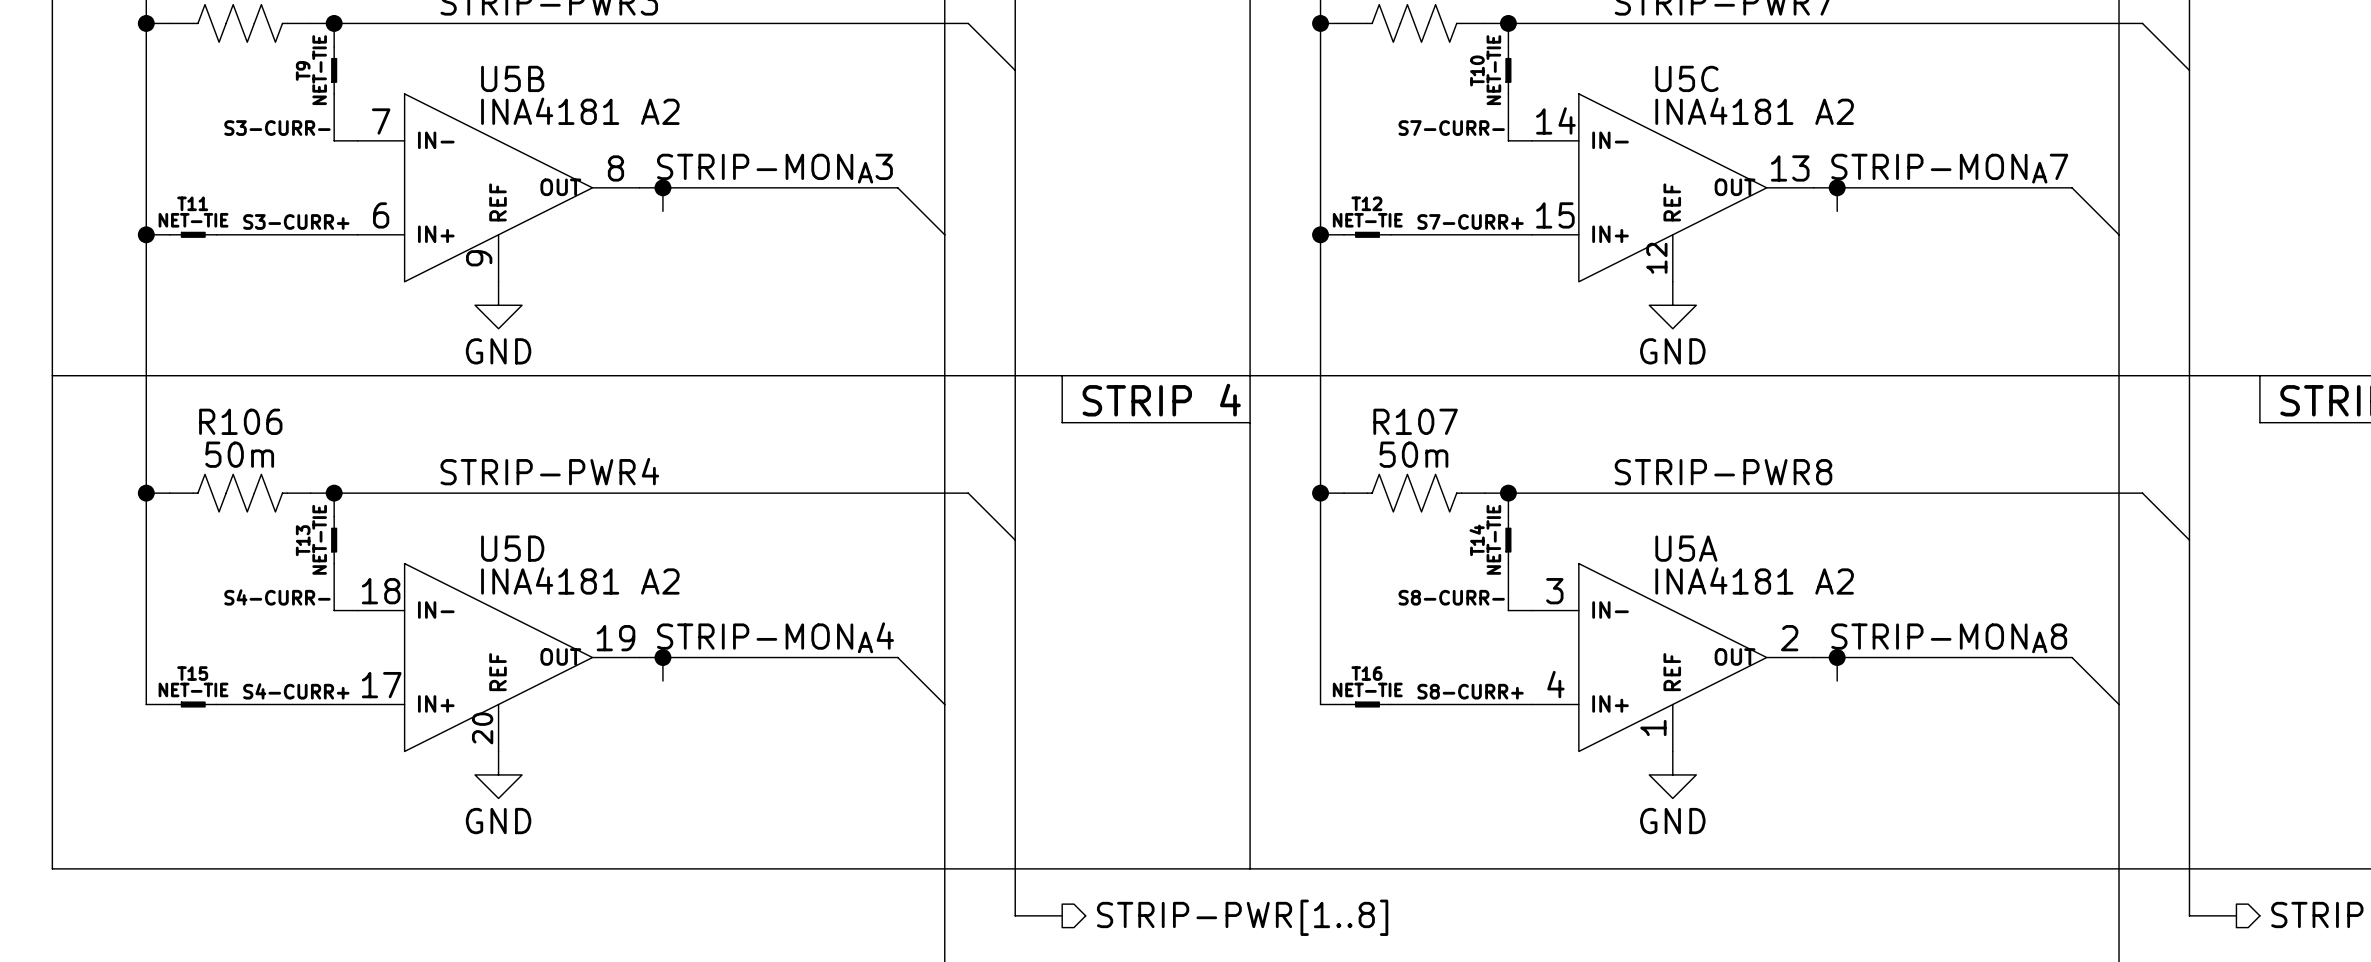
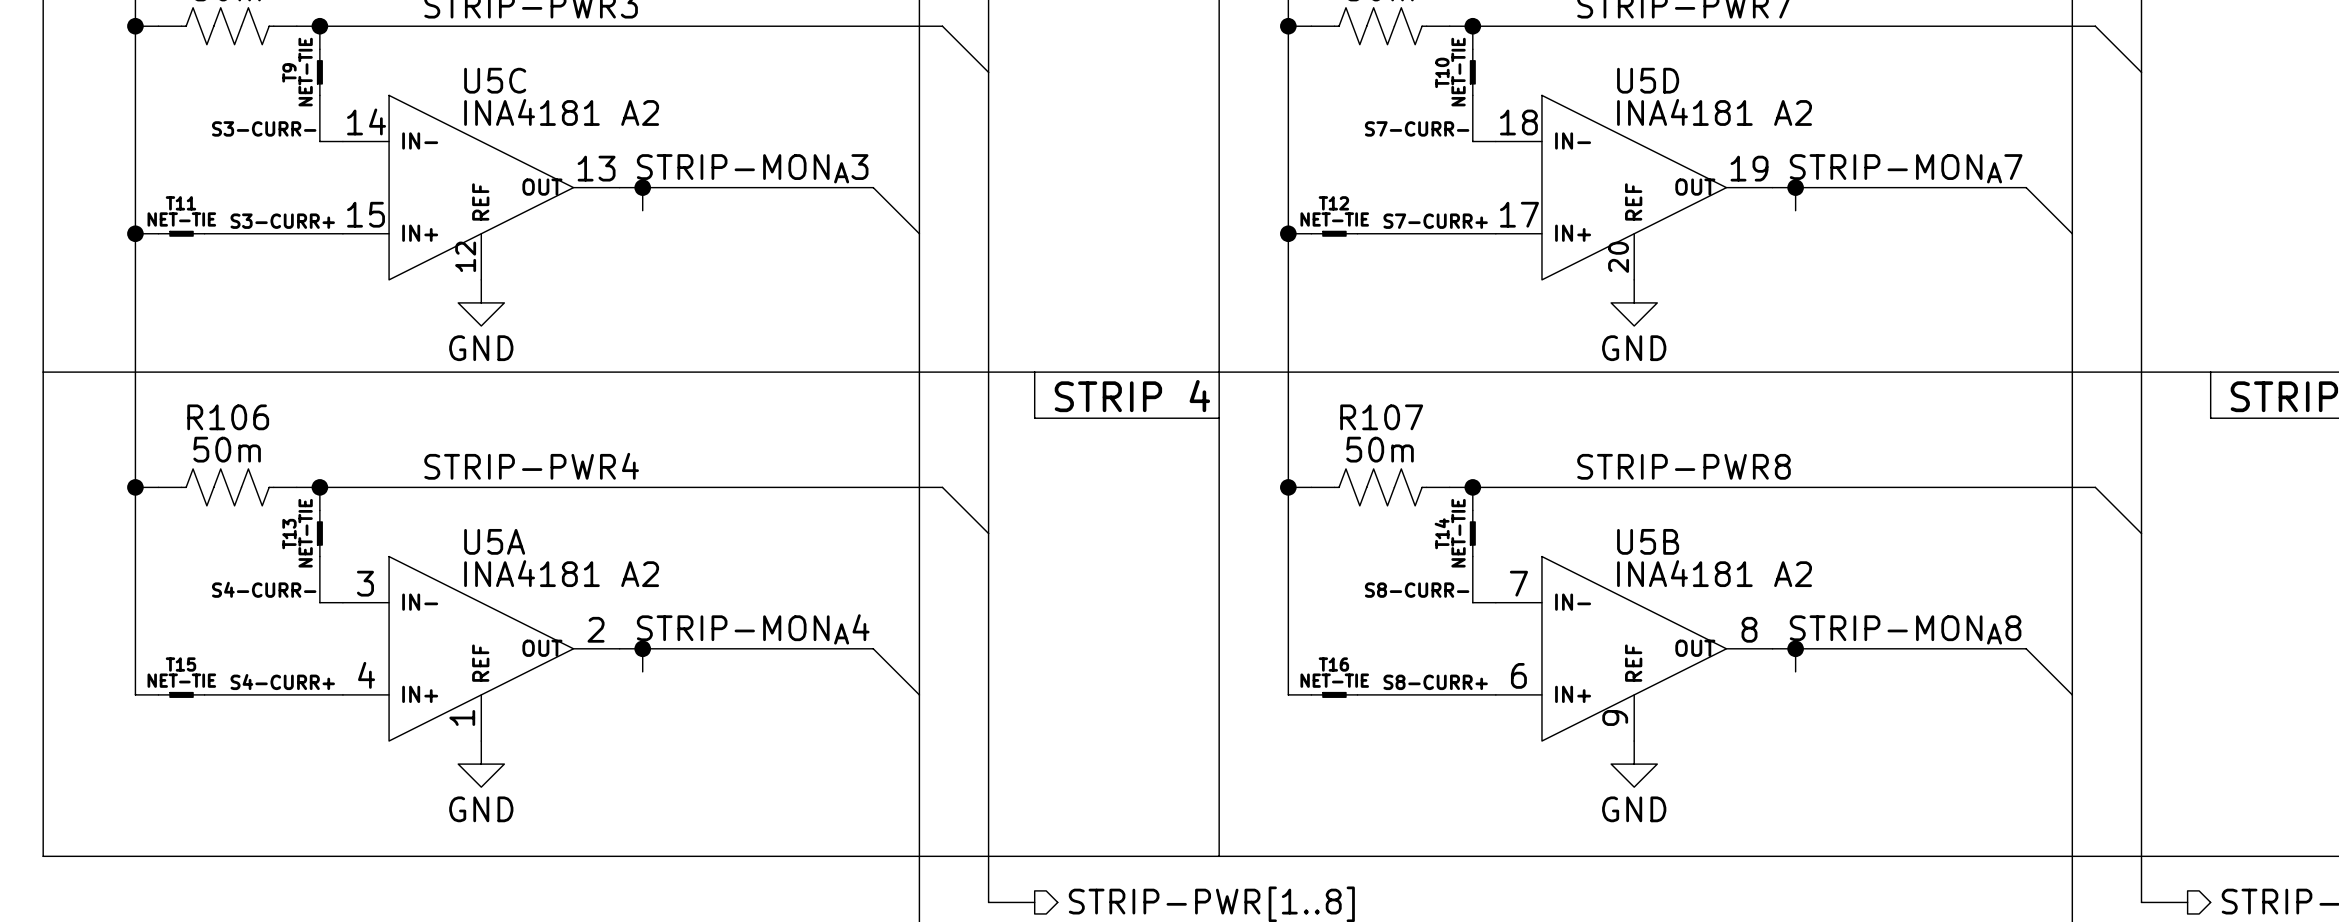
U5B position: (498, 187) -> (1634, 648)
U5C position: (1672, 187) -> (481, 187)
U5D position: (498, 657) -> (1634, 187)
U5A position: (1672, 657) -> (481, 648)

